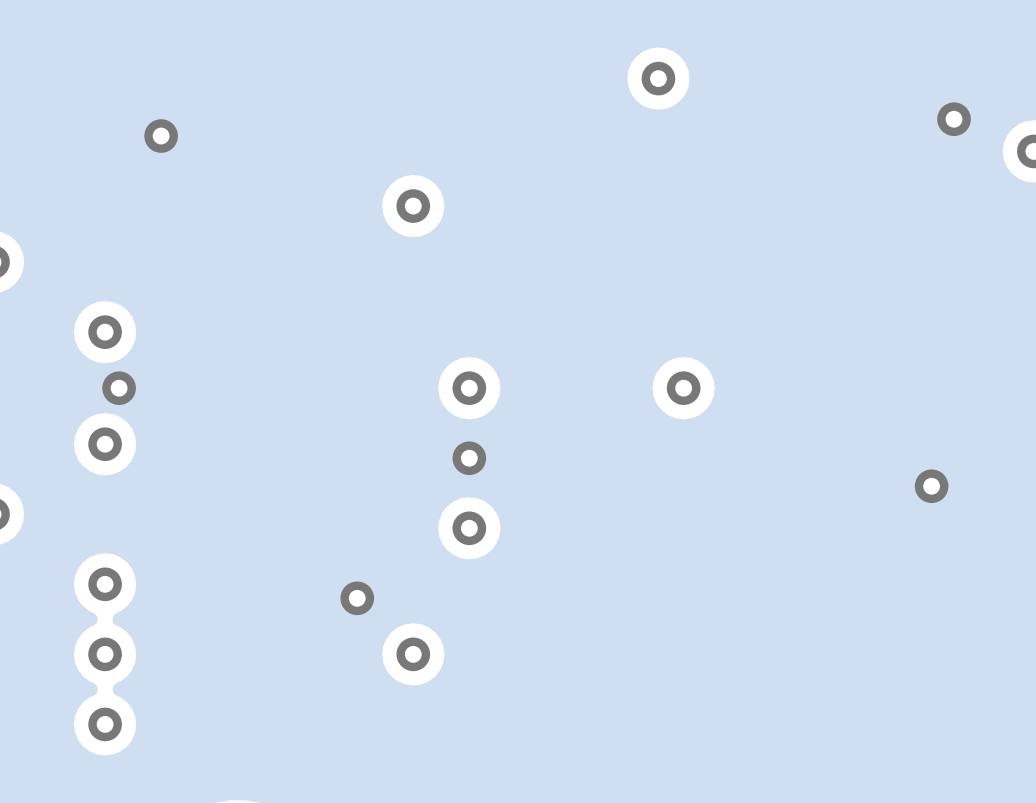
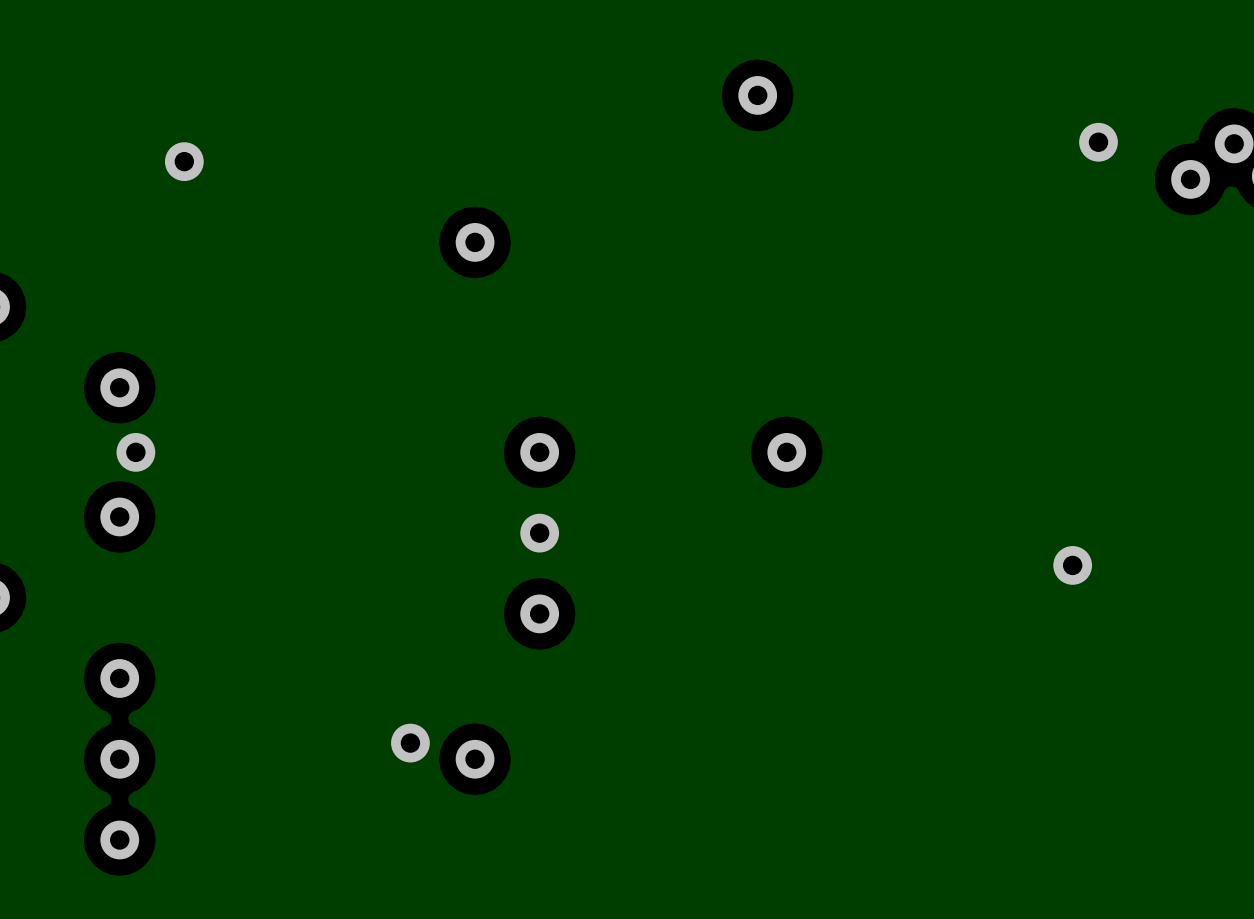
via position: (357, 598) -> (410, 743)

